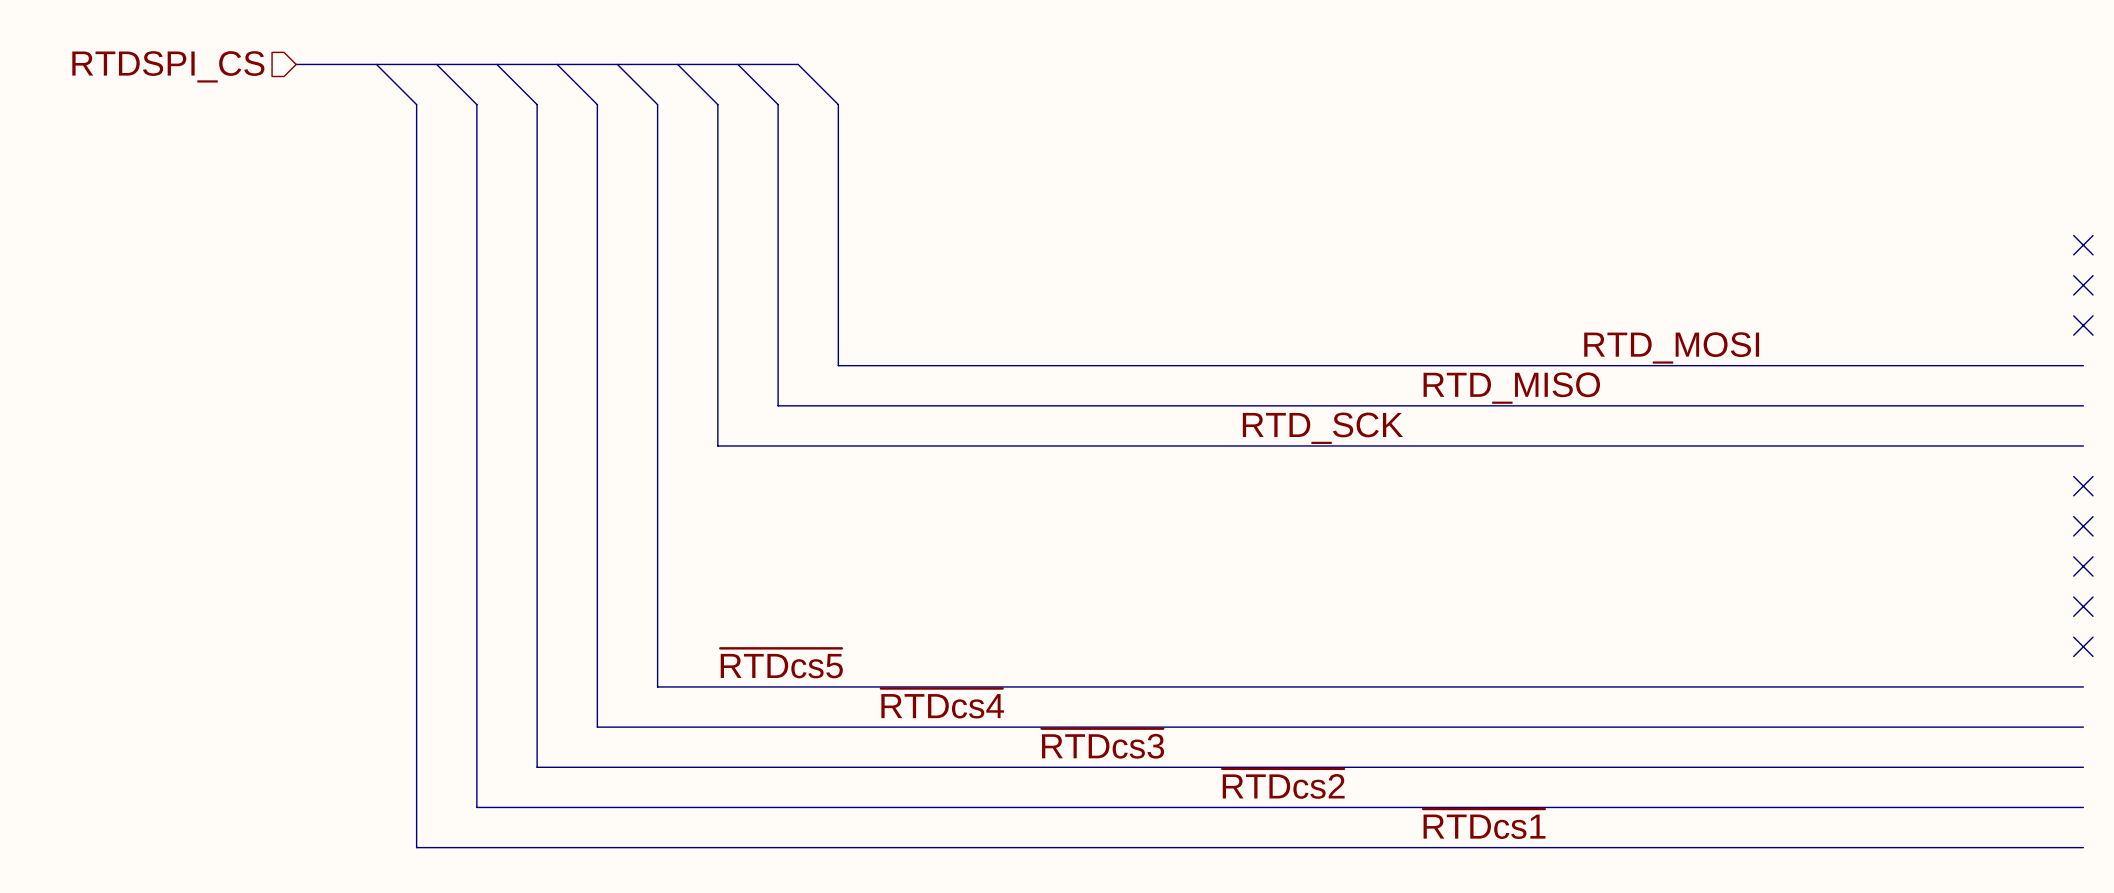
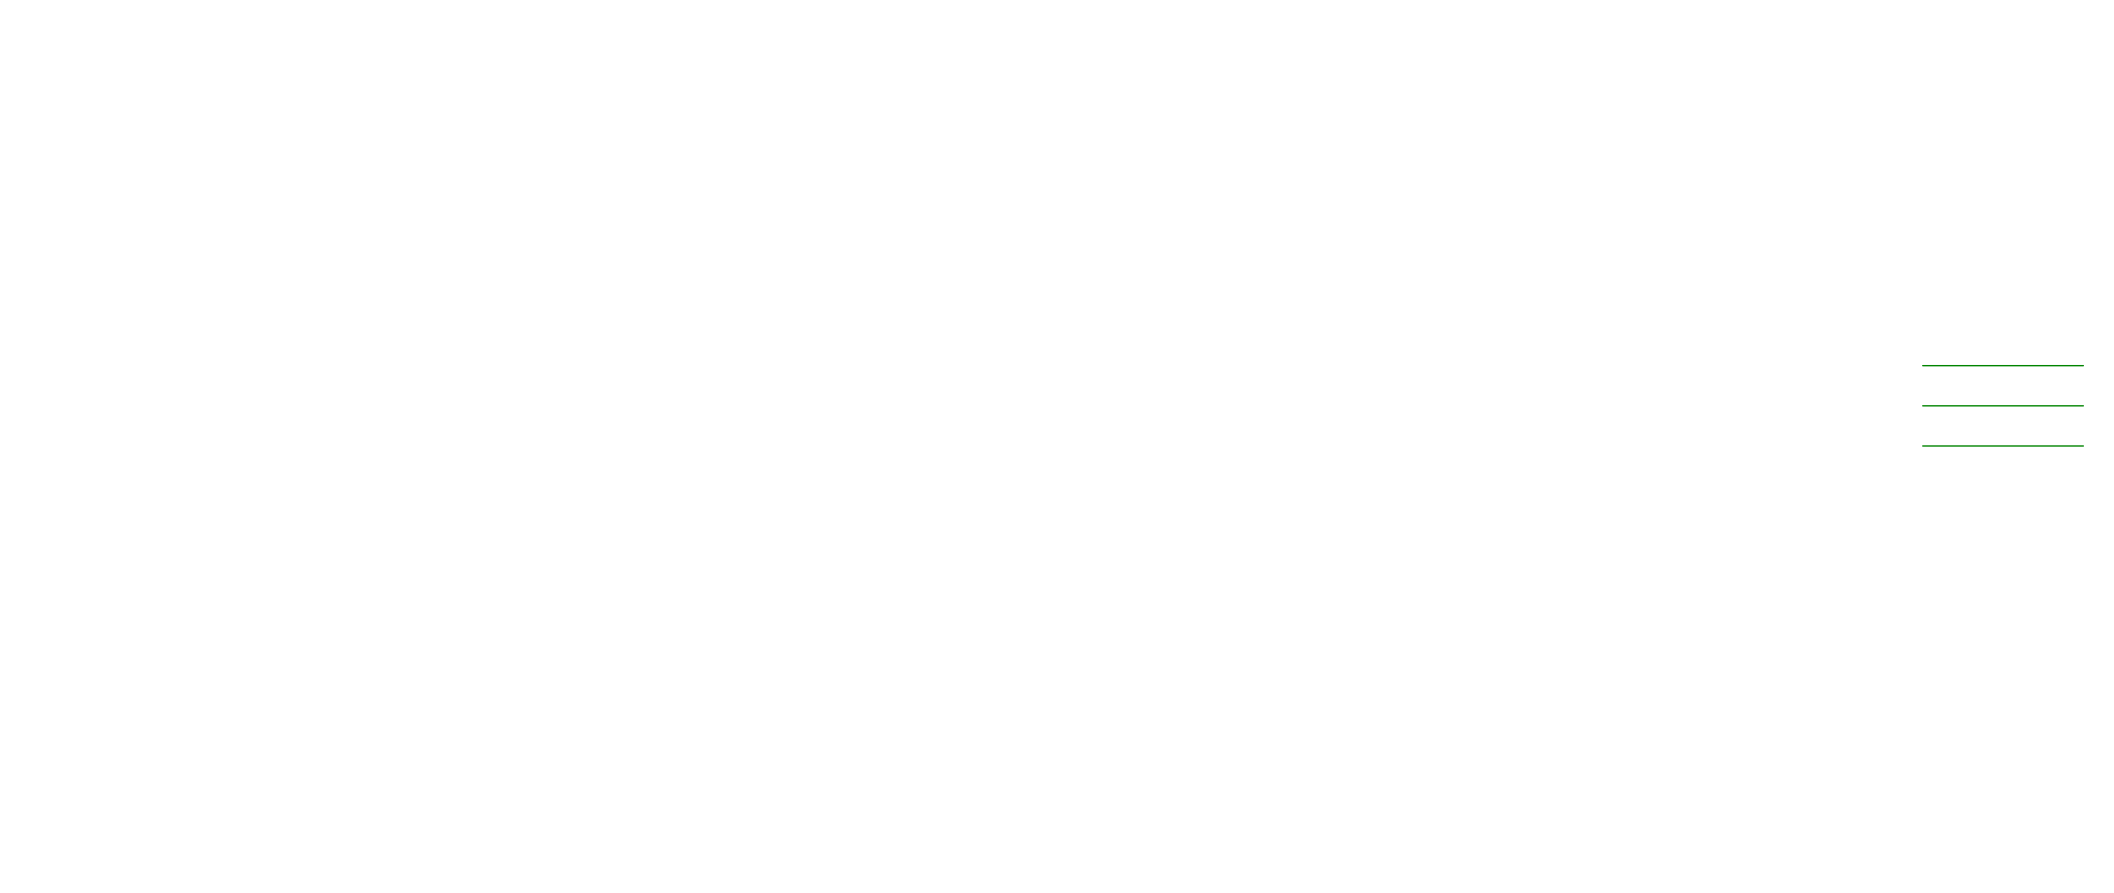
bus: (296, 64) (798, 64) -> none
wire: (376, 64) (416, 104) (416, 847) (2083, 847) -> none
wire: (436, 64) (476, 104) (476, 807) (2083, 807) -> none
wire: (496, 64) (537, 104) (537, 767) (2083, 767) -> none
wire: (557, 64) (597, 104) (597, 727) (2083, 727) -> none
wire: (617, 64) (657, 104) (657, 686) (2083, 686) -> none
wire: (677, 64) (717, 104) (717, 445) (1922, 445) -> none
wire: (737, 64) (778, 104) (778, 405) (1922, 405) -> none
wire: (798, 64) (838, 104) (838, 365) (1922, 365) -> none
hierarchical label: RTDSPI_CS (168, 66) -> none
no-connect mark: (2083, 245) -> none
no-connect mark: (2083, 285) -> none
no-connect mark: (2083, 325) -> none
label: RTD_MOSI (1671, 347) -> none
label: RTD_MISO (1511, 388) -> none
label: RTD_SCK (1322, 428) -> none
no-connect mark: (2083, 486) -> none
no-connect mark: (2083, 526) -> none
no-connect mark: (2083, 566) -> none
no-connect mark: (2083, 606) -> none
no-connect mark: (2083, 646) -> none
label: ~{RTDcs5} (781, 663) -> none
label: ~{RTDcs4} (942, 703) -> none
label: ~{RTDcs3} (1102, 743) -> none
label: ~{RTDcs2} (1283, 783) -> none
label: ~{RTDcs1} (1484, 823) -> none

